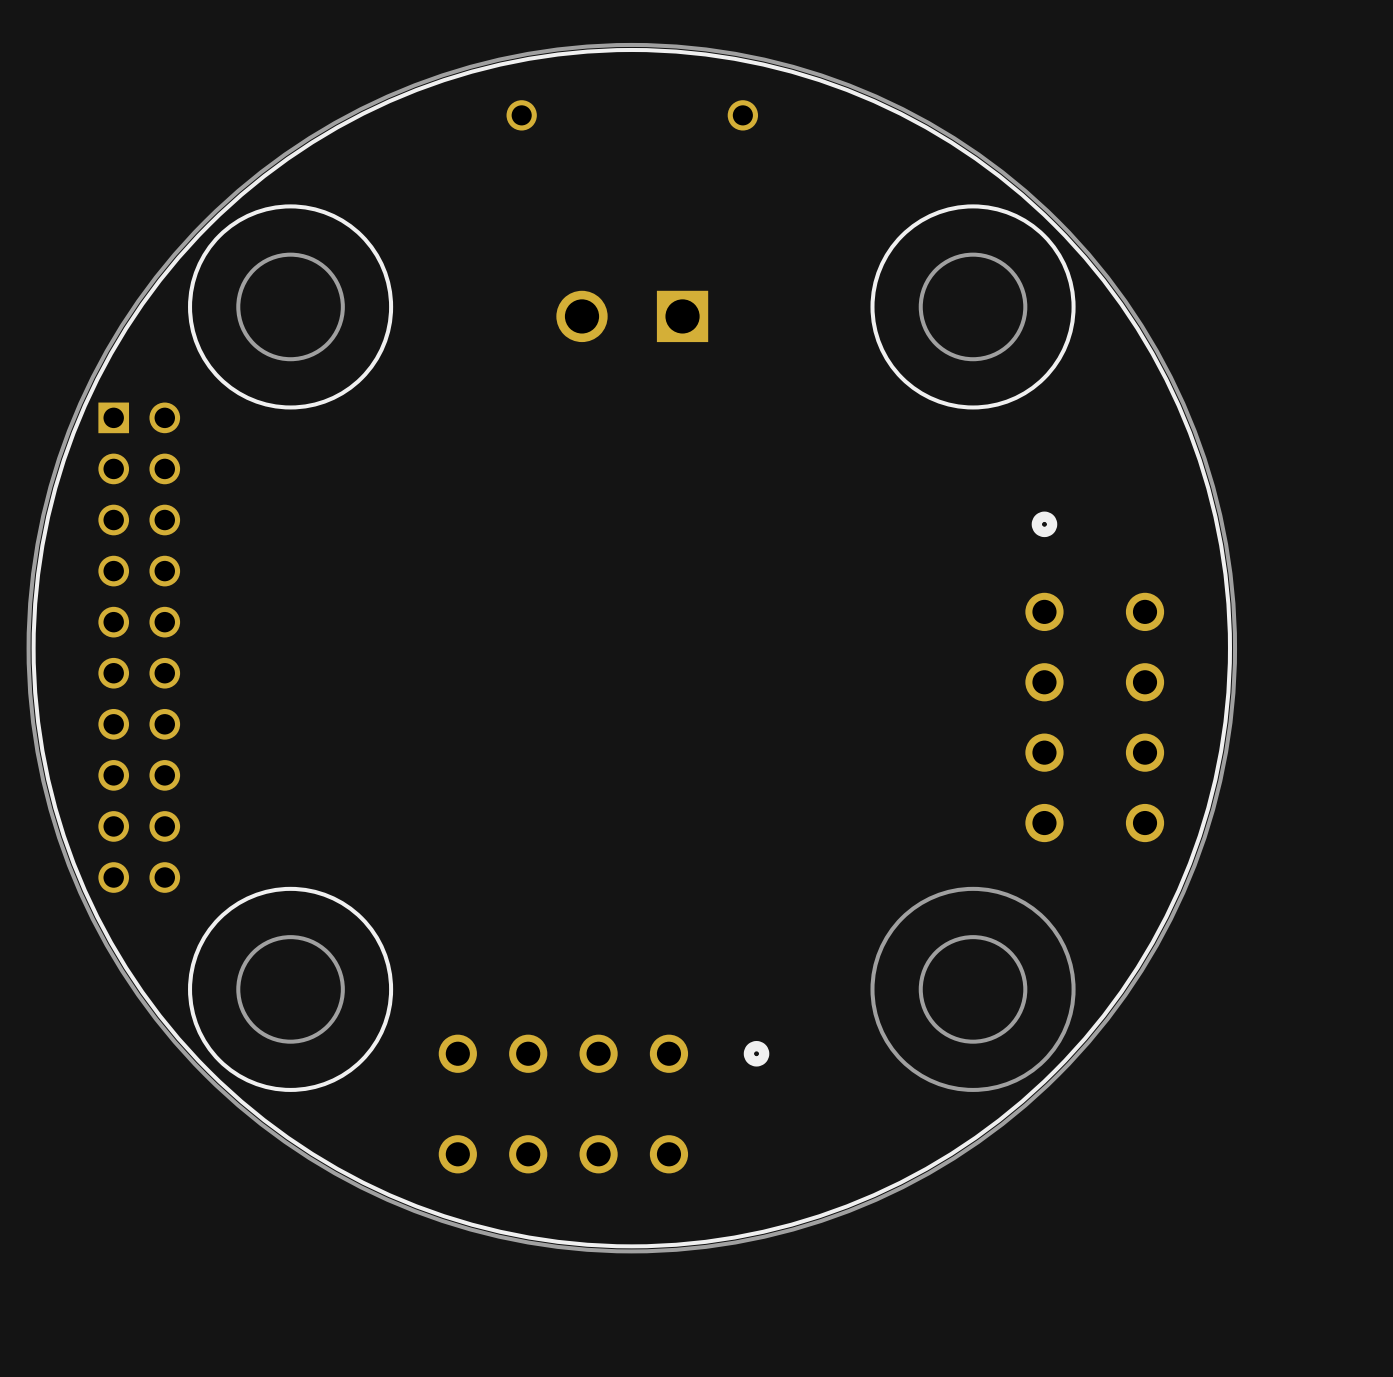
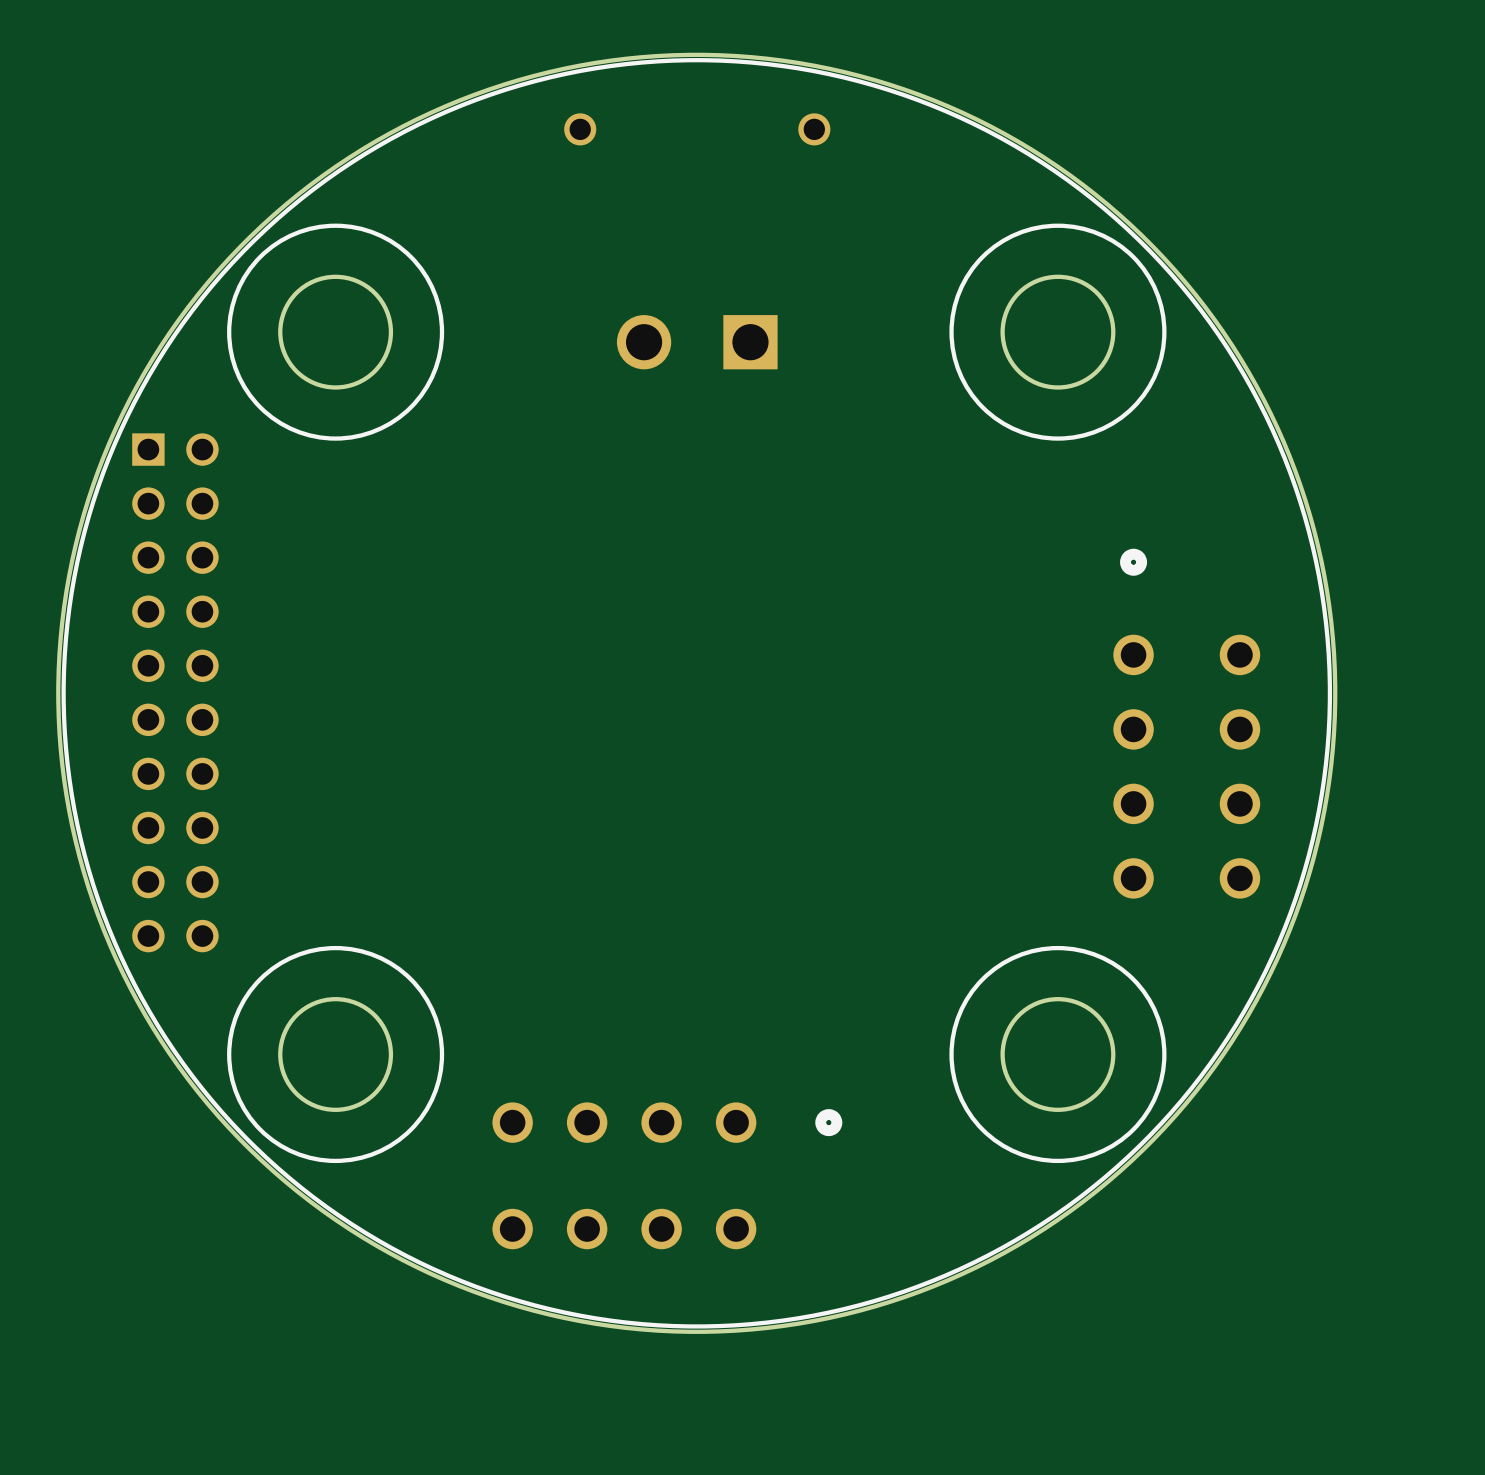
round board edge: [870, 886, 1076, 1092] -> none
drawing: none -> [949, 945, 1167, 1164]

